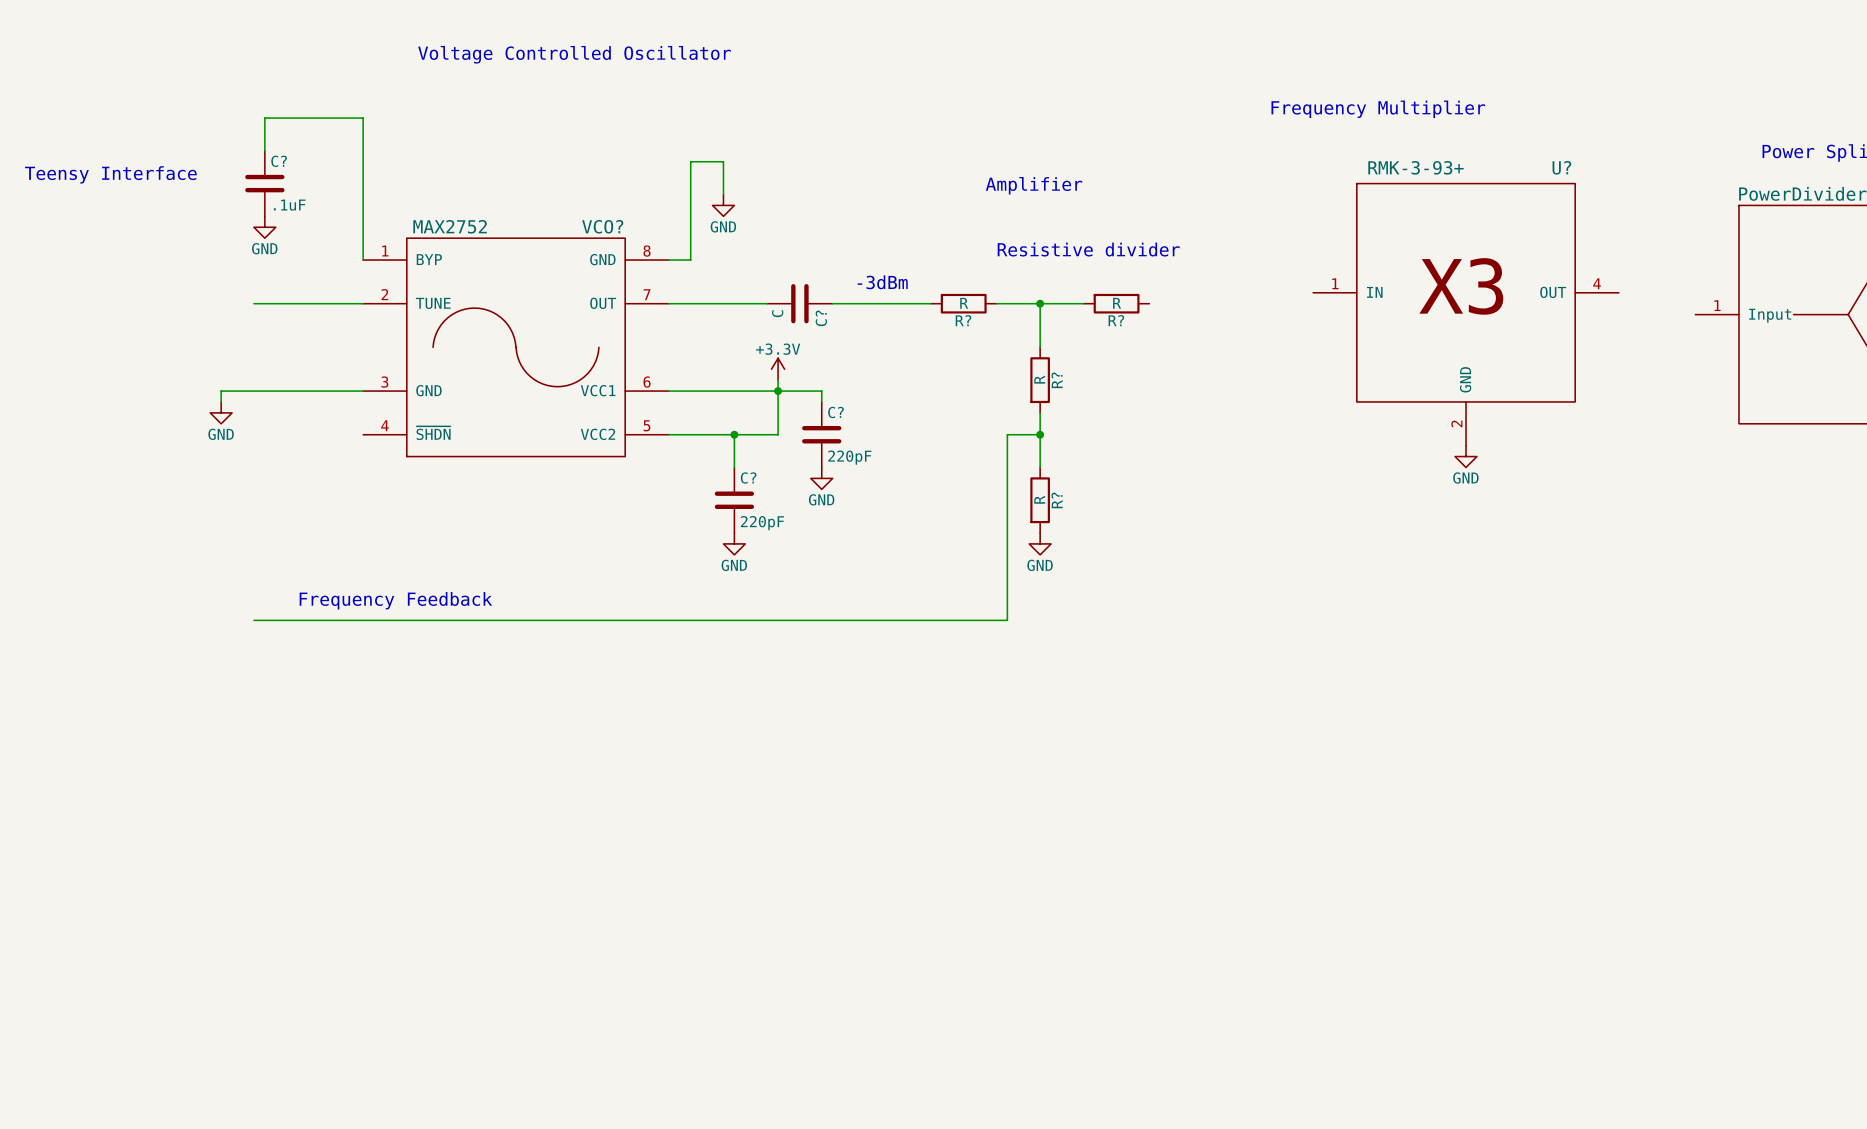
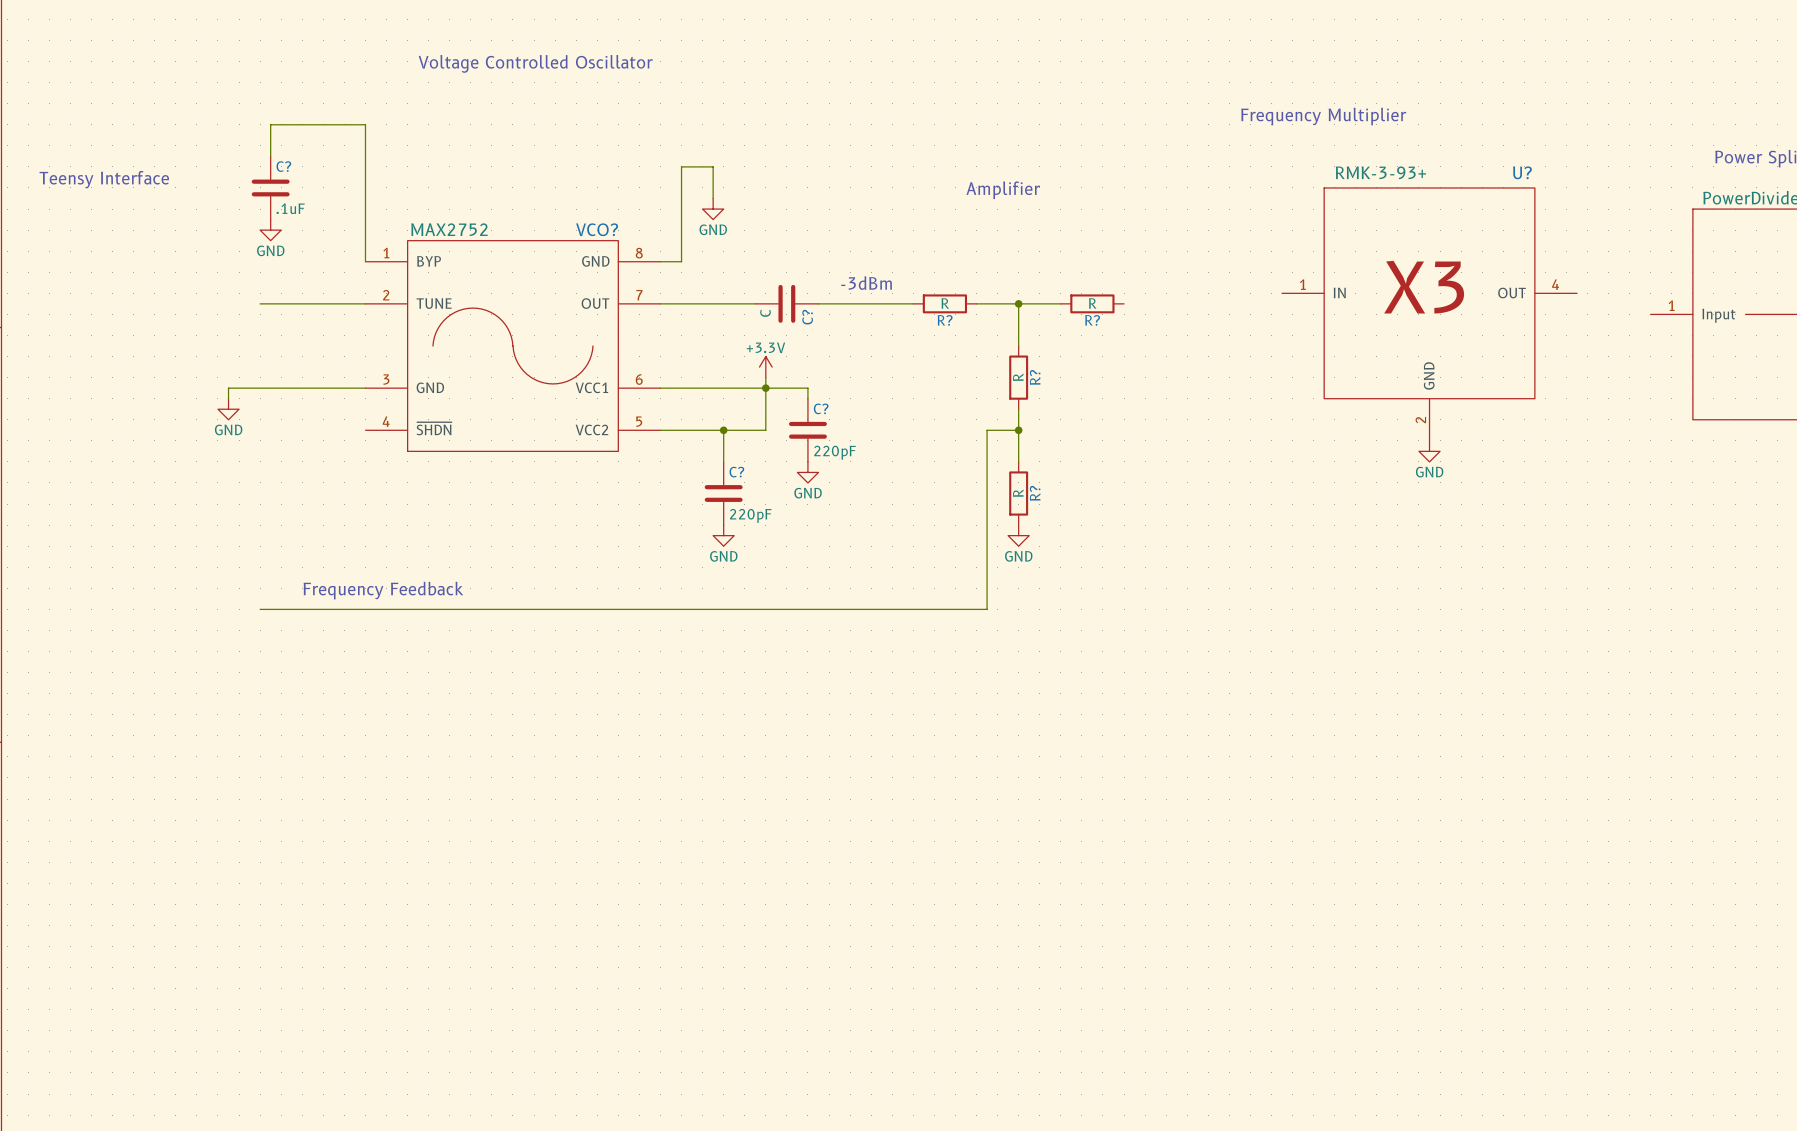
text: Resistive divider (1088, 249) -> none

